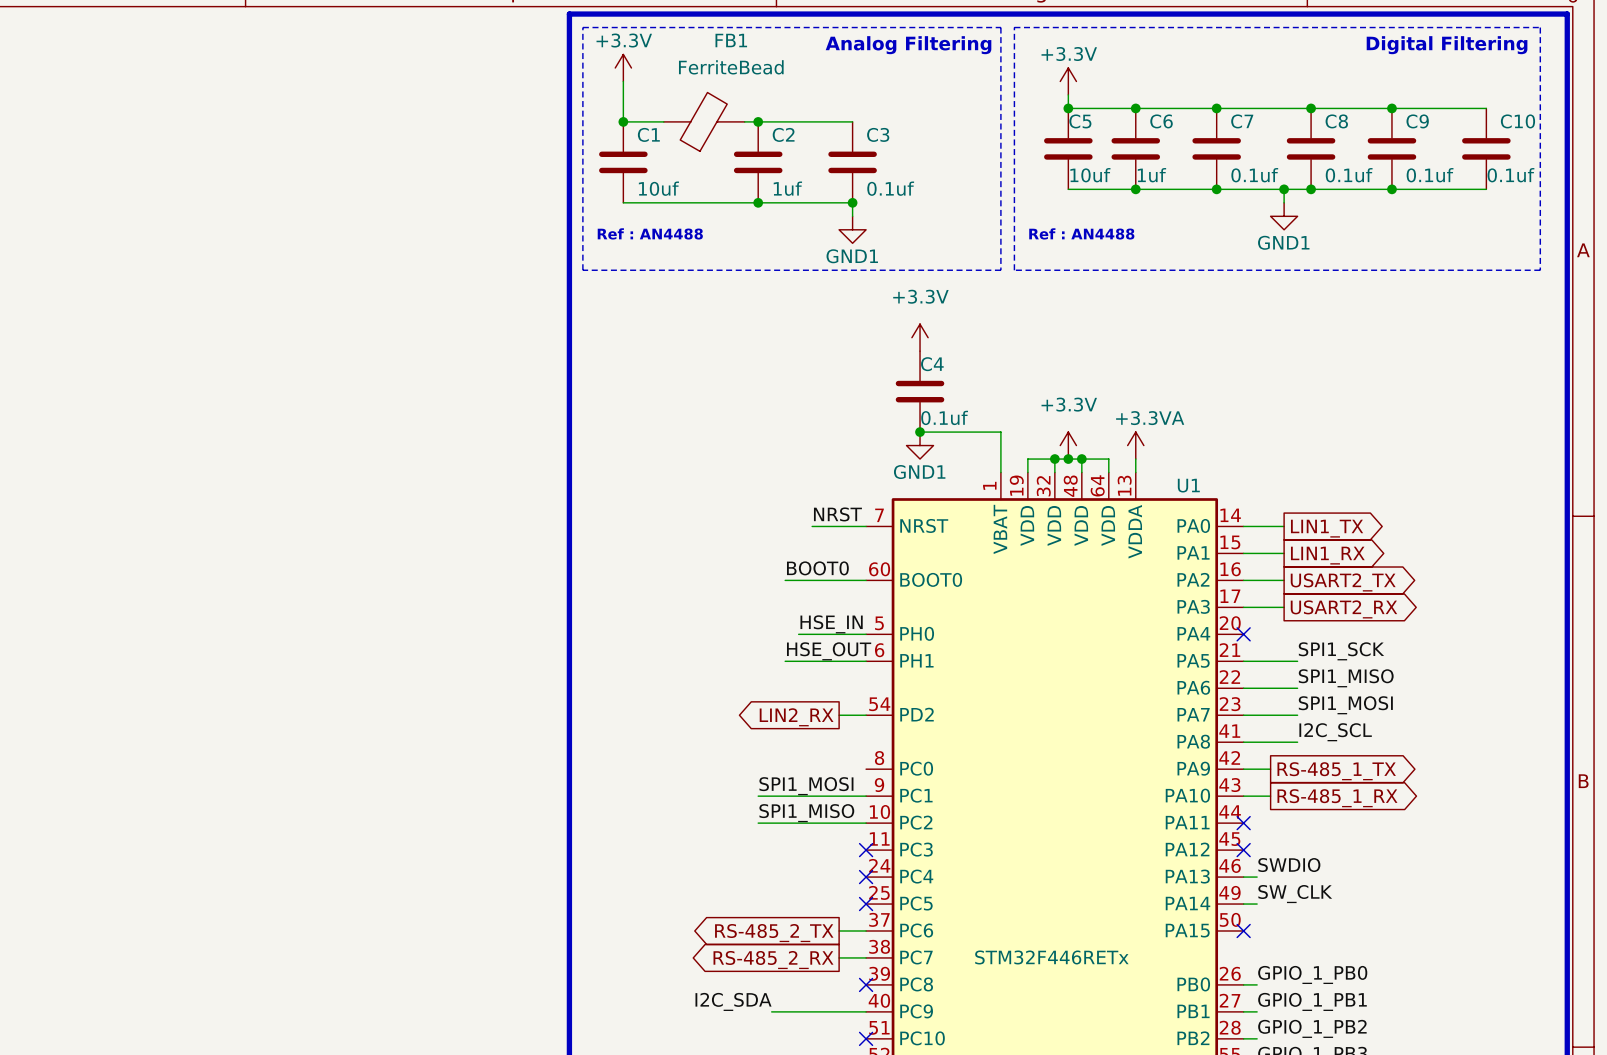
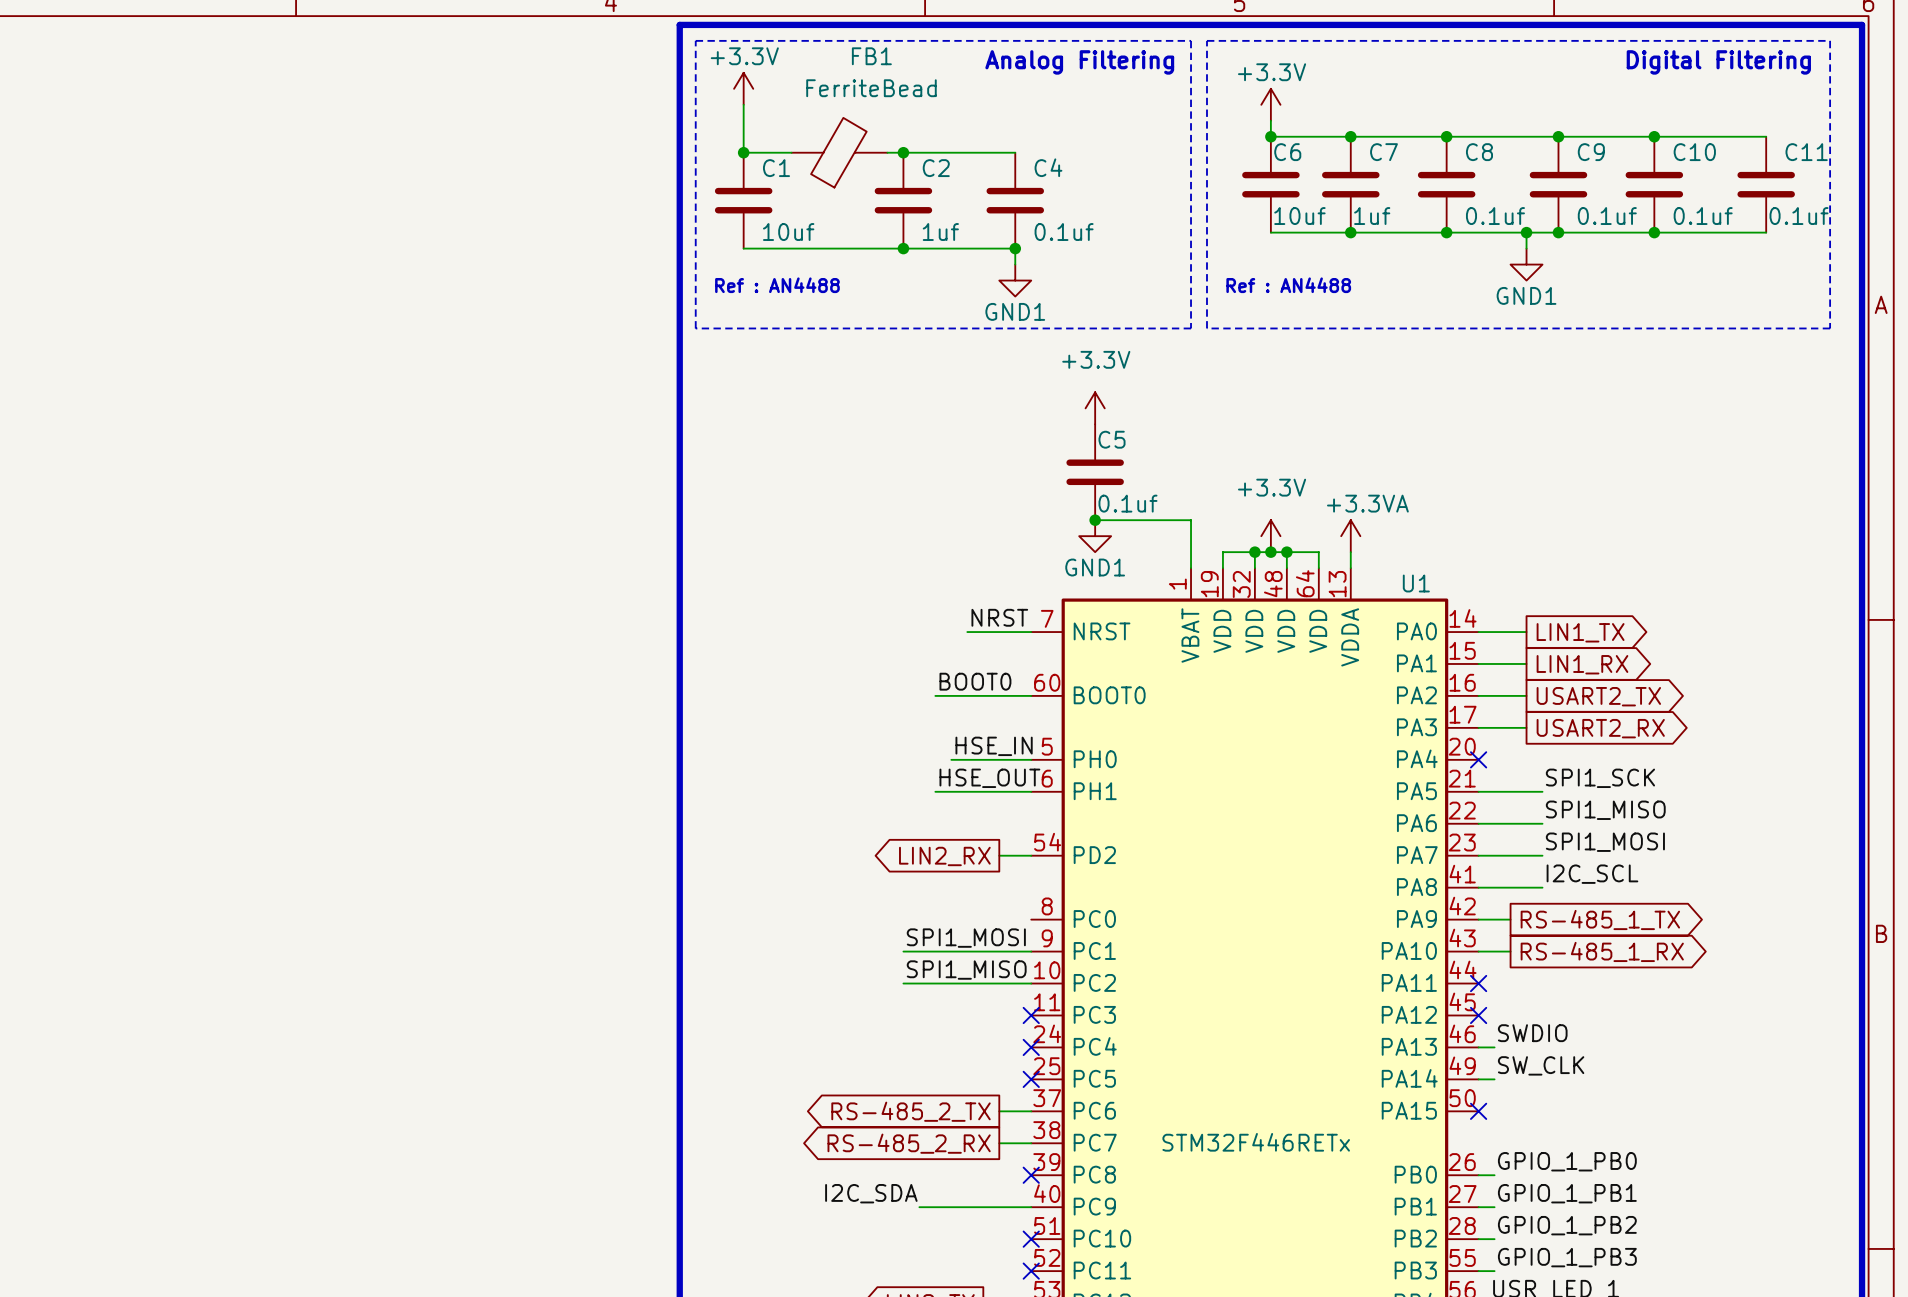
C5 name: C5 (1080, 121) -> C6 (1287, 152)
C6 name: C6 (1161, 121) -> C7 (1384, 152)
C7 name: C7 (1242, 121) -> C8 (1479, 152)
C8 name: C8 (1336, 121) -> C9 (1591, 152)
C9 name: C9 (1417, 121) -> C10 (1694, 152)
C10 name: C10 (1517, 121) -> C11 (1806, 152)
C3 name: C3 (878, 134) -> C4 (1048, 167)
C4 name: C4 (932, 364) -> C5 (1112, 439)

